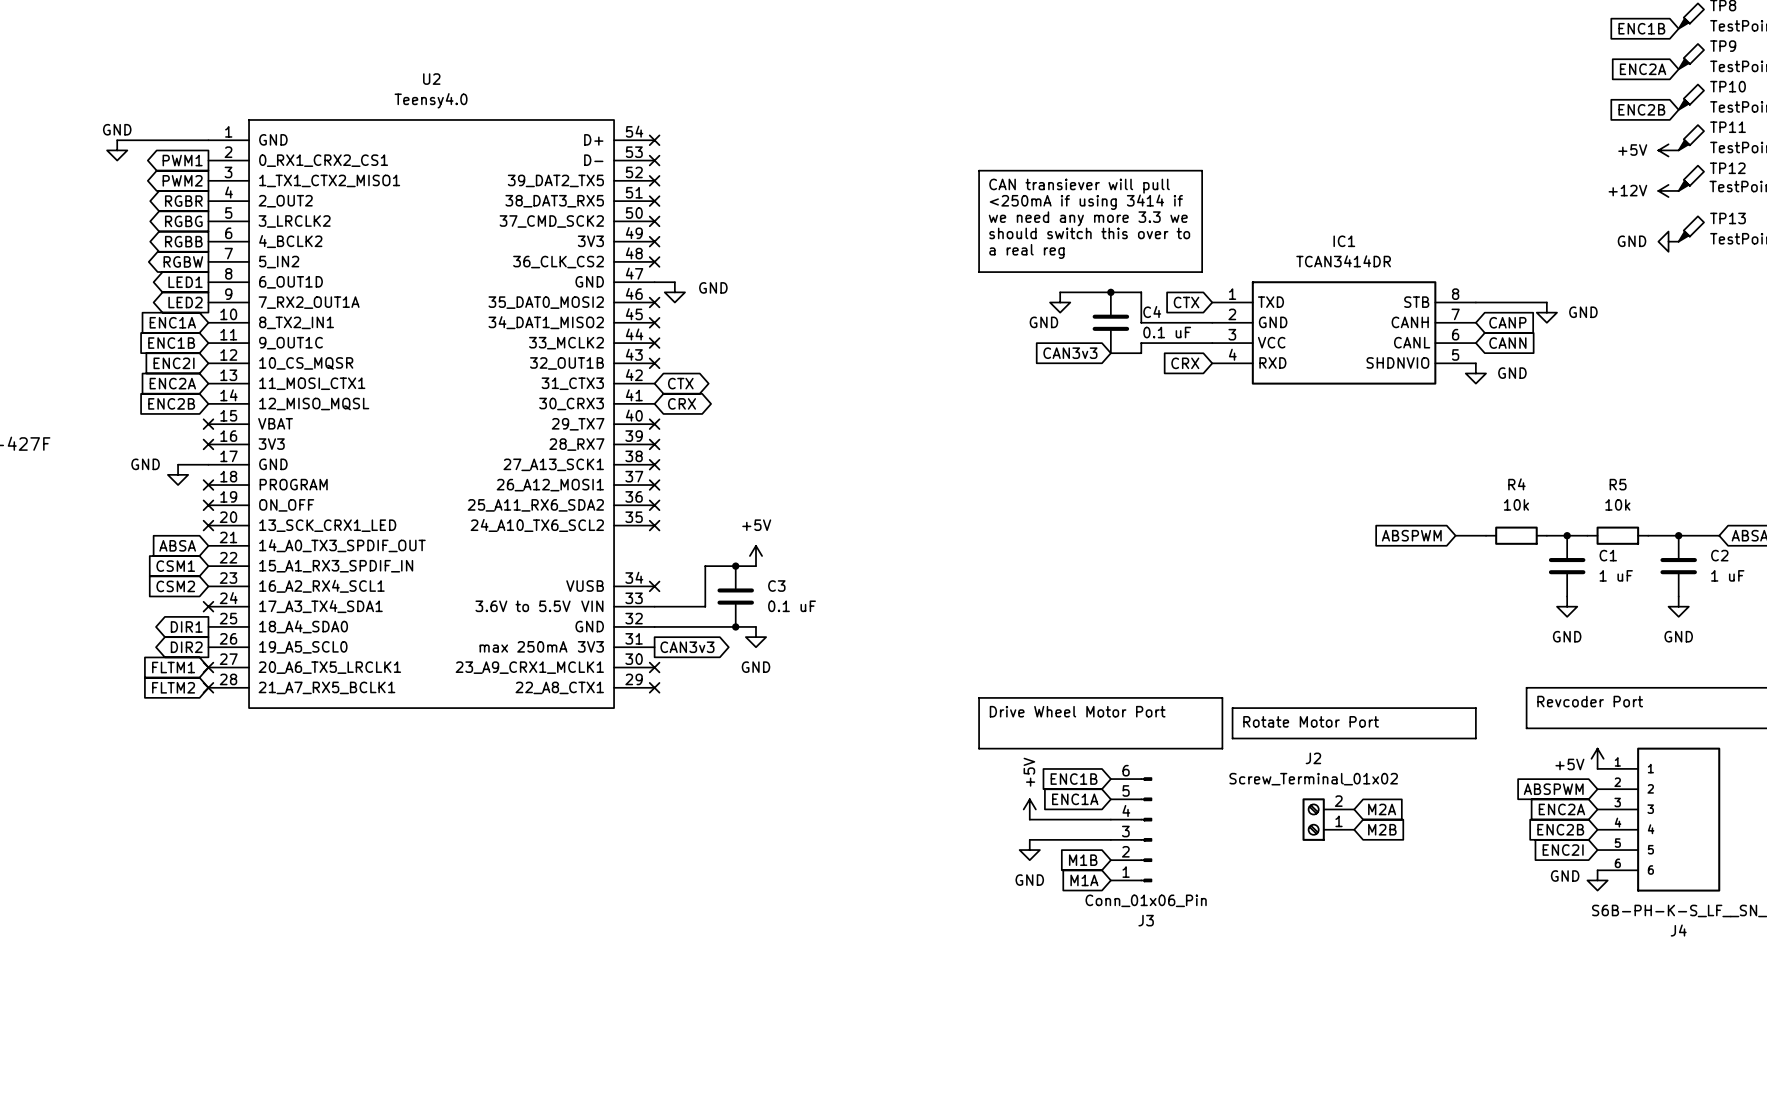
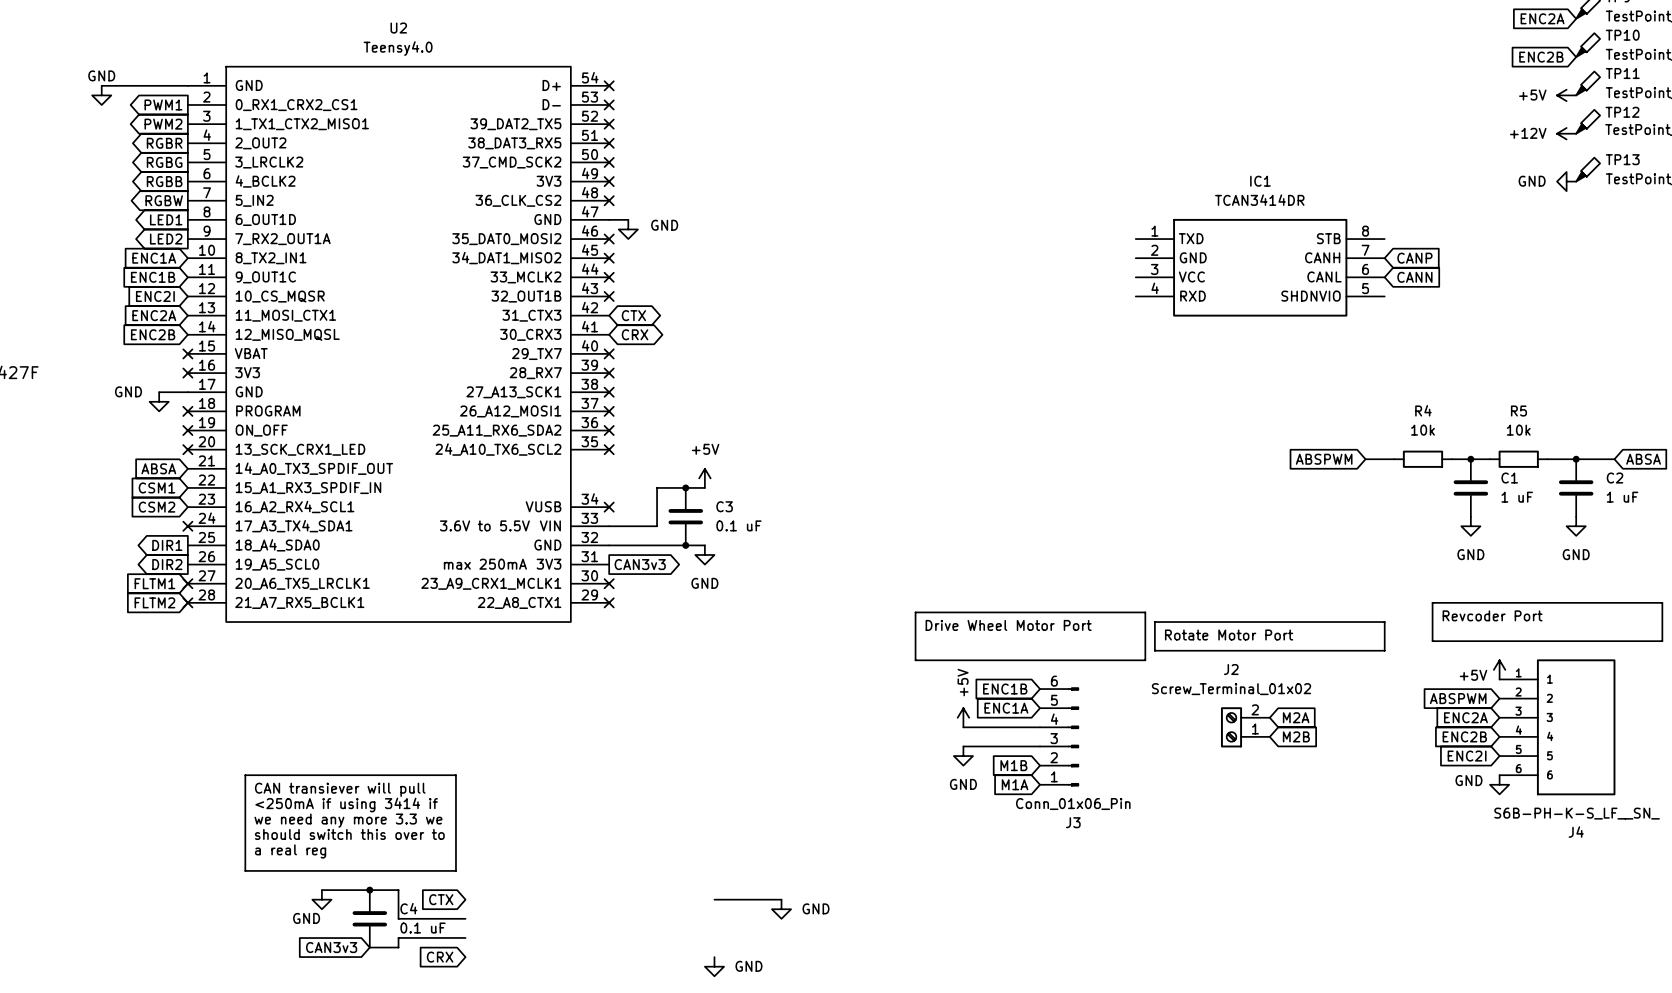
line: (979, 170) (1202, 170) (1202, 272) (979, 272) (979, 170) -> none
text: CAN transiever will pull (1079, 186) -> none
text: <250mA if using 3414 if (1086, 202) -> none
text: we need any more 3.3 we (1088, 218) -> none
text: should switch this over to (1089, 233) -> none
text: a real reg (1026, 251) -> none
wire: (1060, 292) (1141, 292) (1141, 322) (1212, 322) -> none
junction: (1110, 292) -> none
power symbol: GND (1060, 302) -> none
global label: CTX (1186, 302) -> none
wire: (1475, 302) (1546, 302) -> none
power symbol: GND (1546, 312) -> none
C4 position: (1110, 322) -> (369, 918)
wire: (1212, 343) (1141, 343) (1141, 353) (1110, 353) -> none
global label: CAN3v3 (1070, 353) -> none
global label: CRX (1185, 363) -> none
power symbol: GND (1475, 373) -> none
line: none -> (245, 775) (455, 775) (455, 870) (245, 870) (245, 775)
text: none -> CAN transiever will pull (340, 789)
text: none -> <250mA if using 3414 if (346, 804)
text: none -> we need any more 3.3 we (348, 820)
text: none -> should switch this over to (349, 834)
text: none -> a real reg (290, 851)
wire: none -> (321, 890) (398, 890) (398, 918) (465, 918)
junction: none -> (369, 890)
power symbol: none -> GND (321, 899)
global label: none -> CTX (441, 899)
wire: none -> (714, 899) (781, 899)
power symbol: none -> GND (781, 909)
wire: none -> (465, 937) (398, 937) (398, 947) (369, 947)
global label: none -> CAN3v3 (331, 947)
global label: none -> CRX (440, 957)
power symbol: none -> GND (714, 966)

